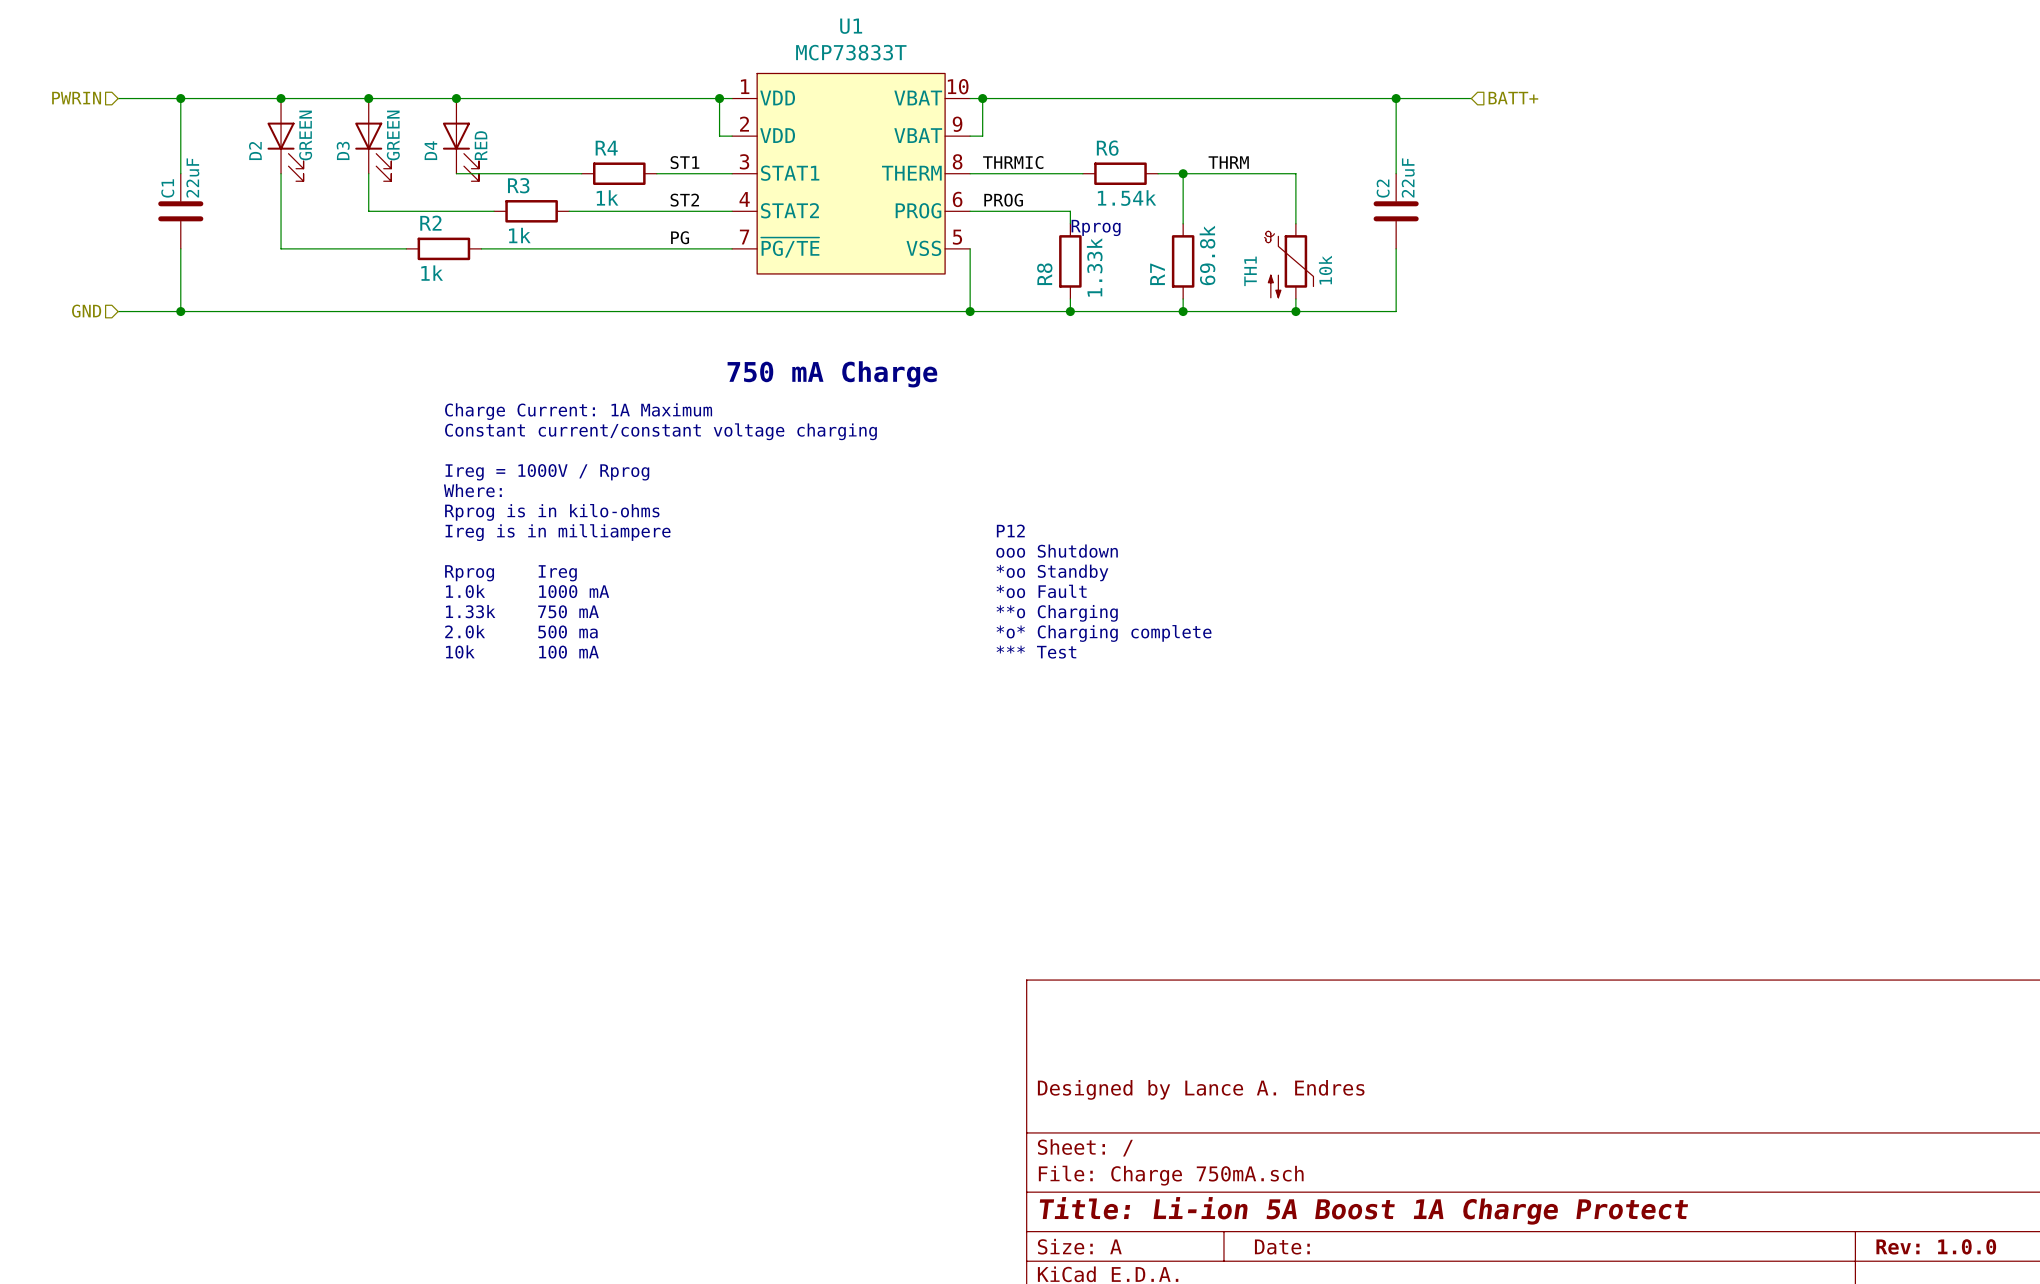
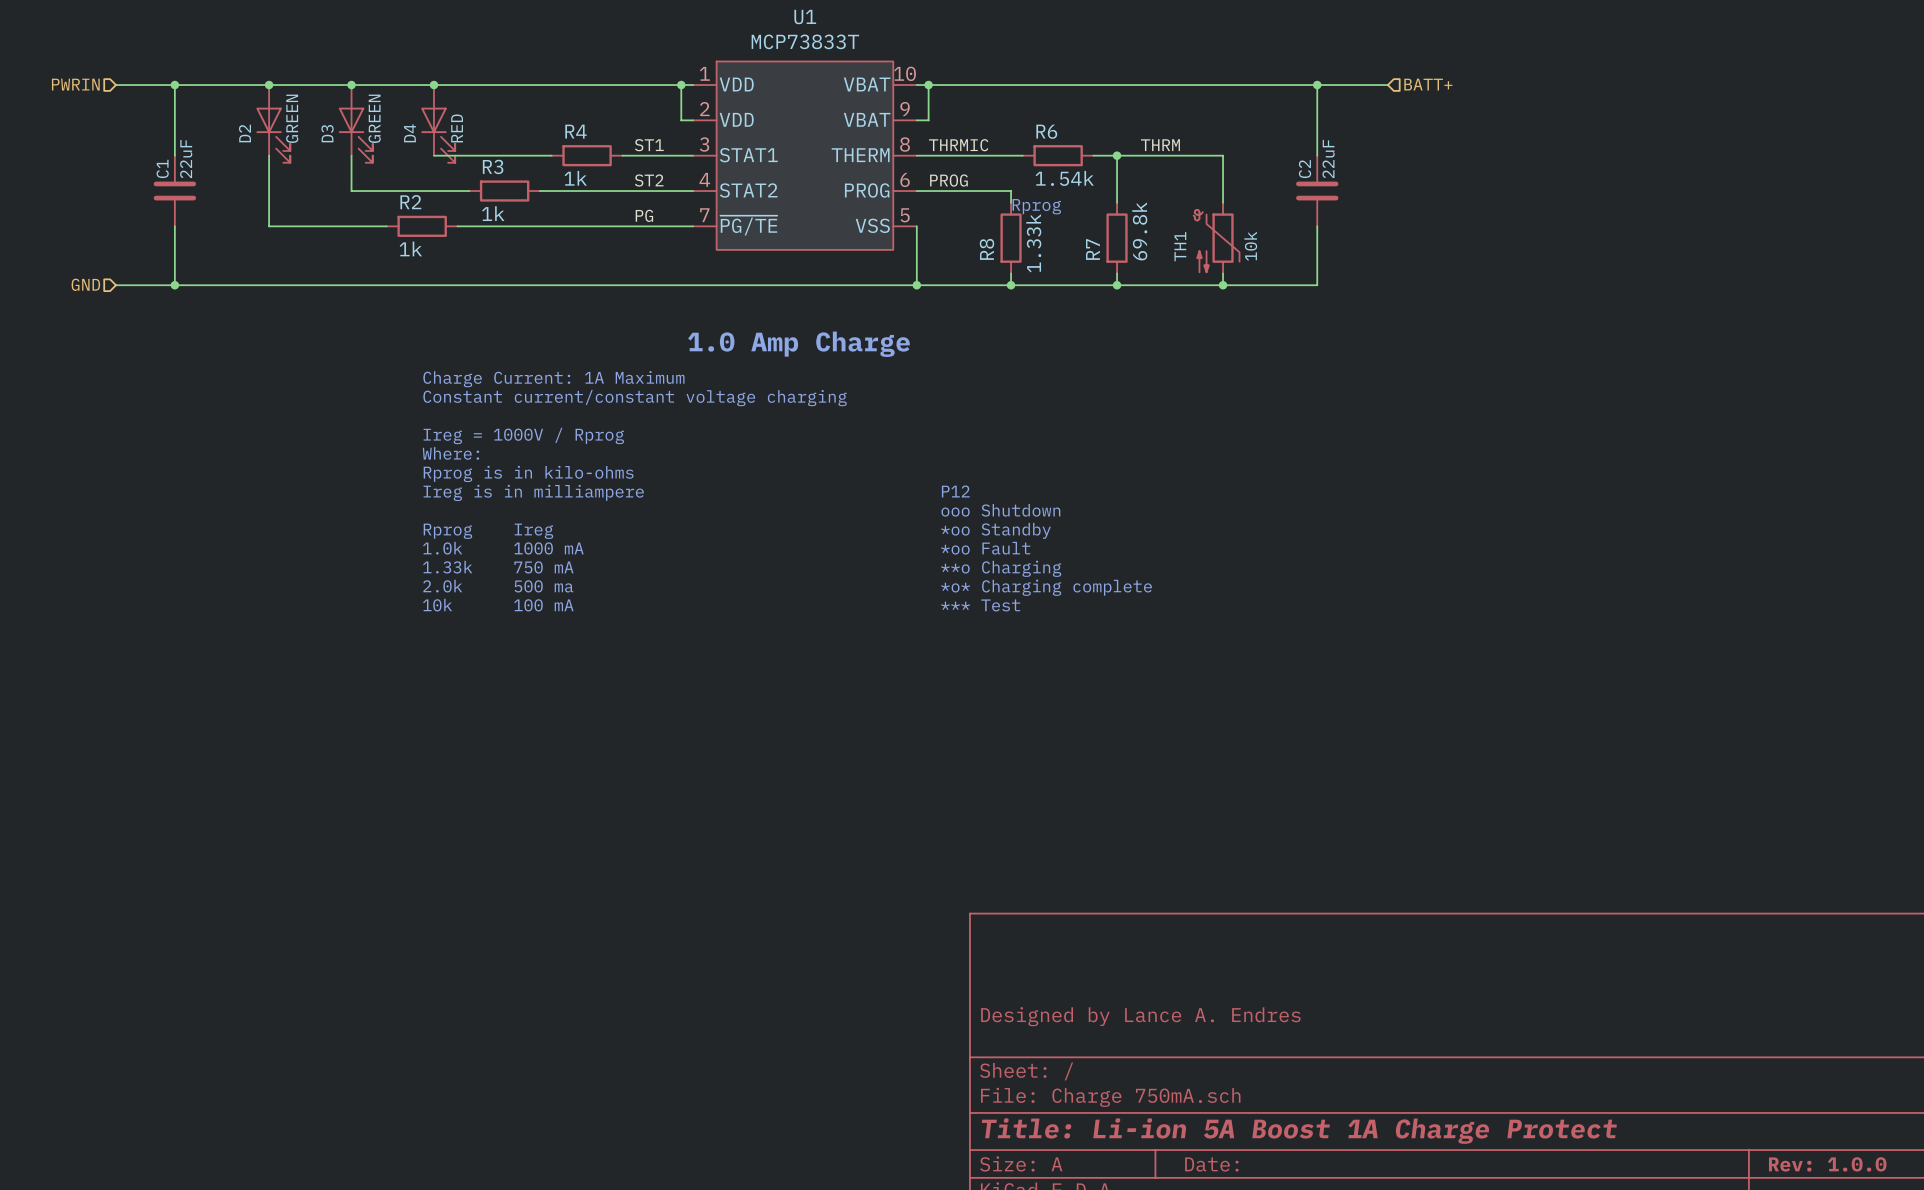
text: 750 mA Charge (832, 374) -> 1.0 Amp Charge (798, 344)

